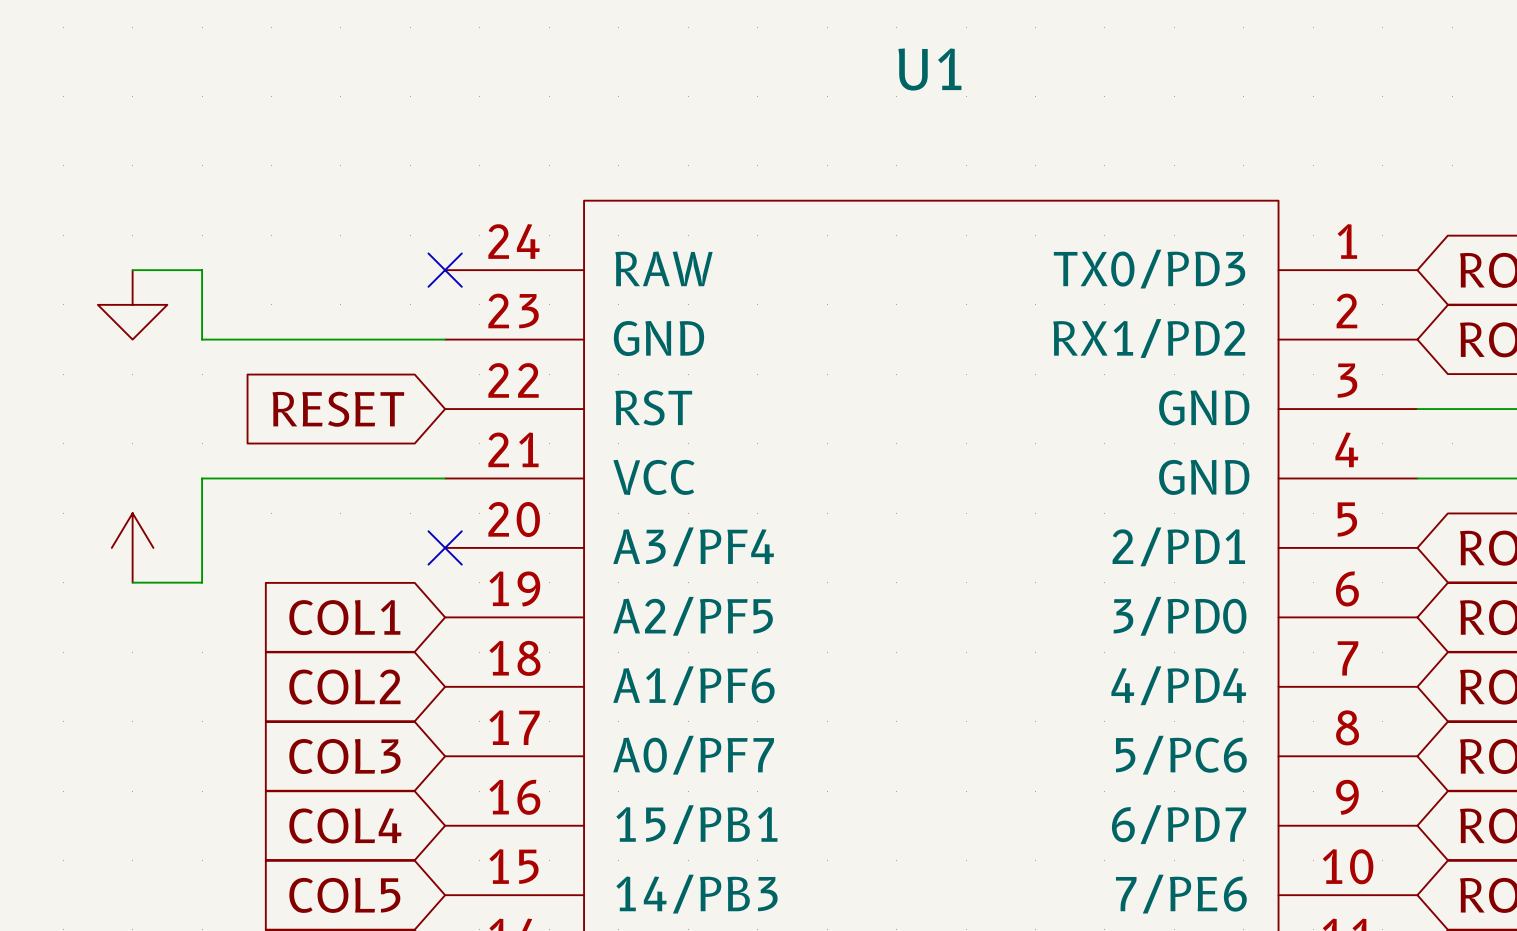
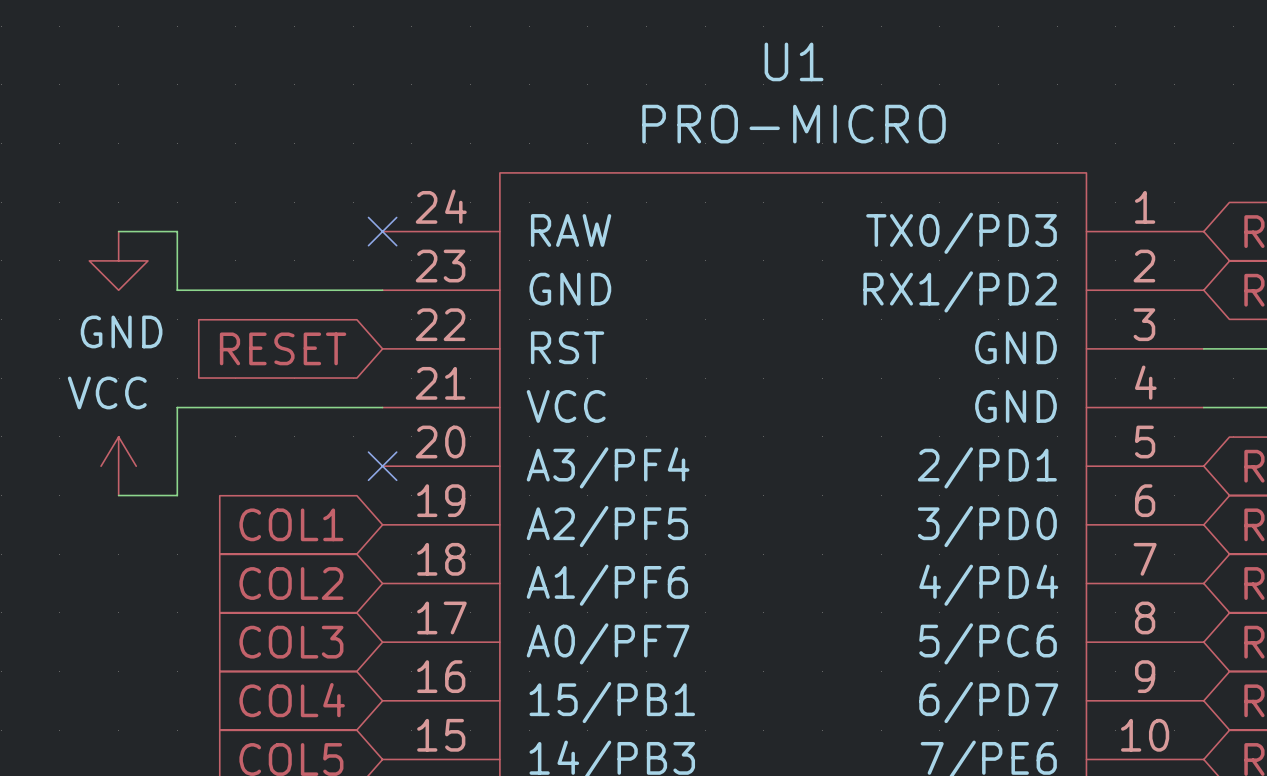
U1 value: none -> PRO-MICRO (794, 124)
power symbol text: none -> GND (121, 331)
power symbol text: none -> VCC (107, 392)

